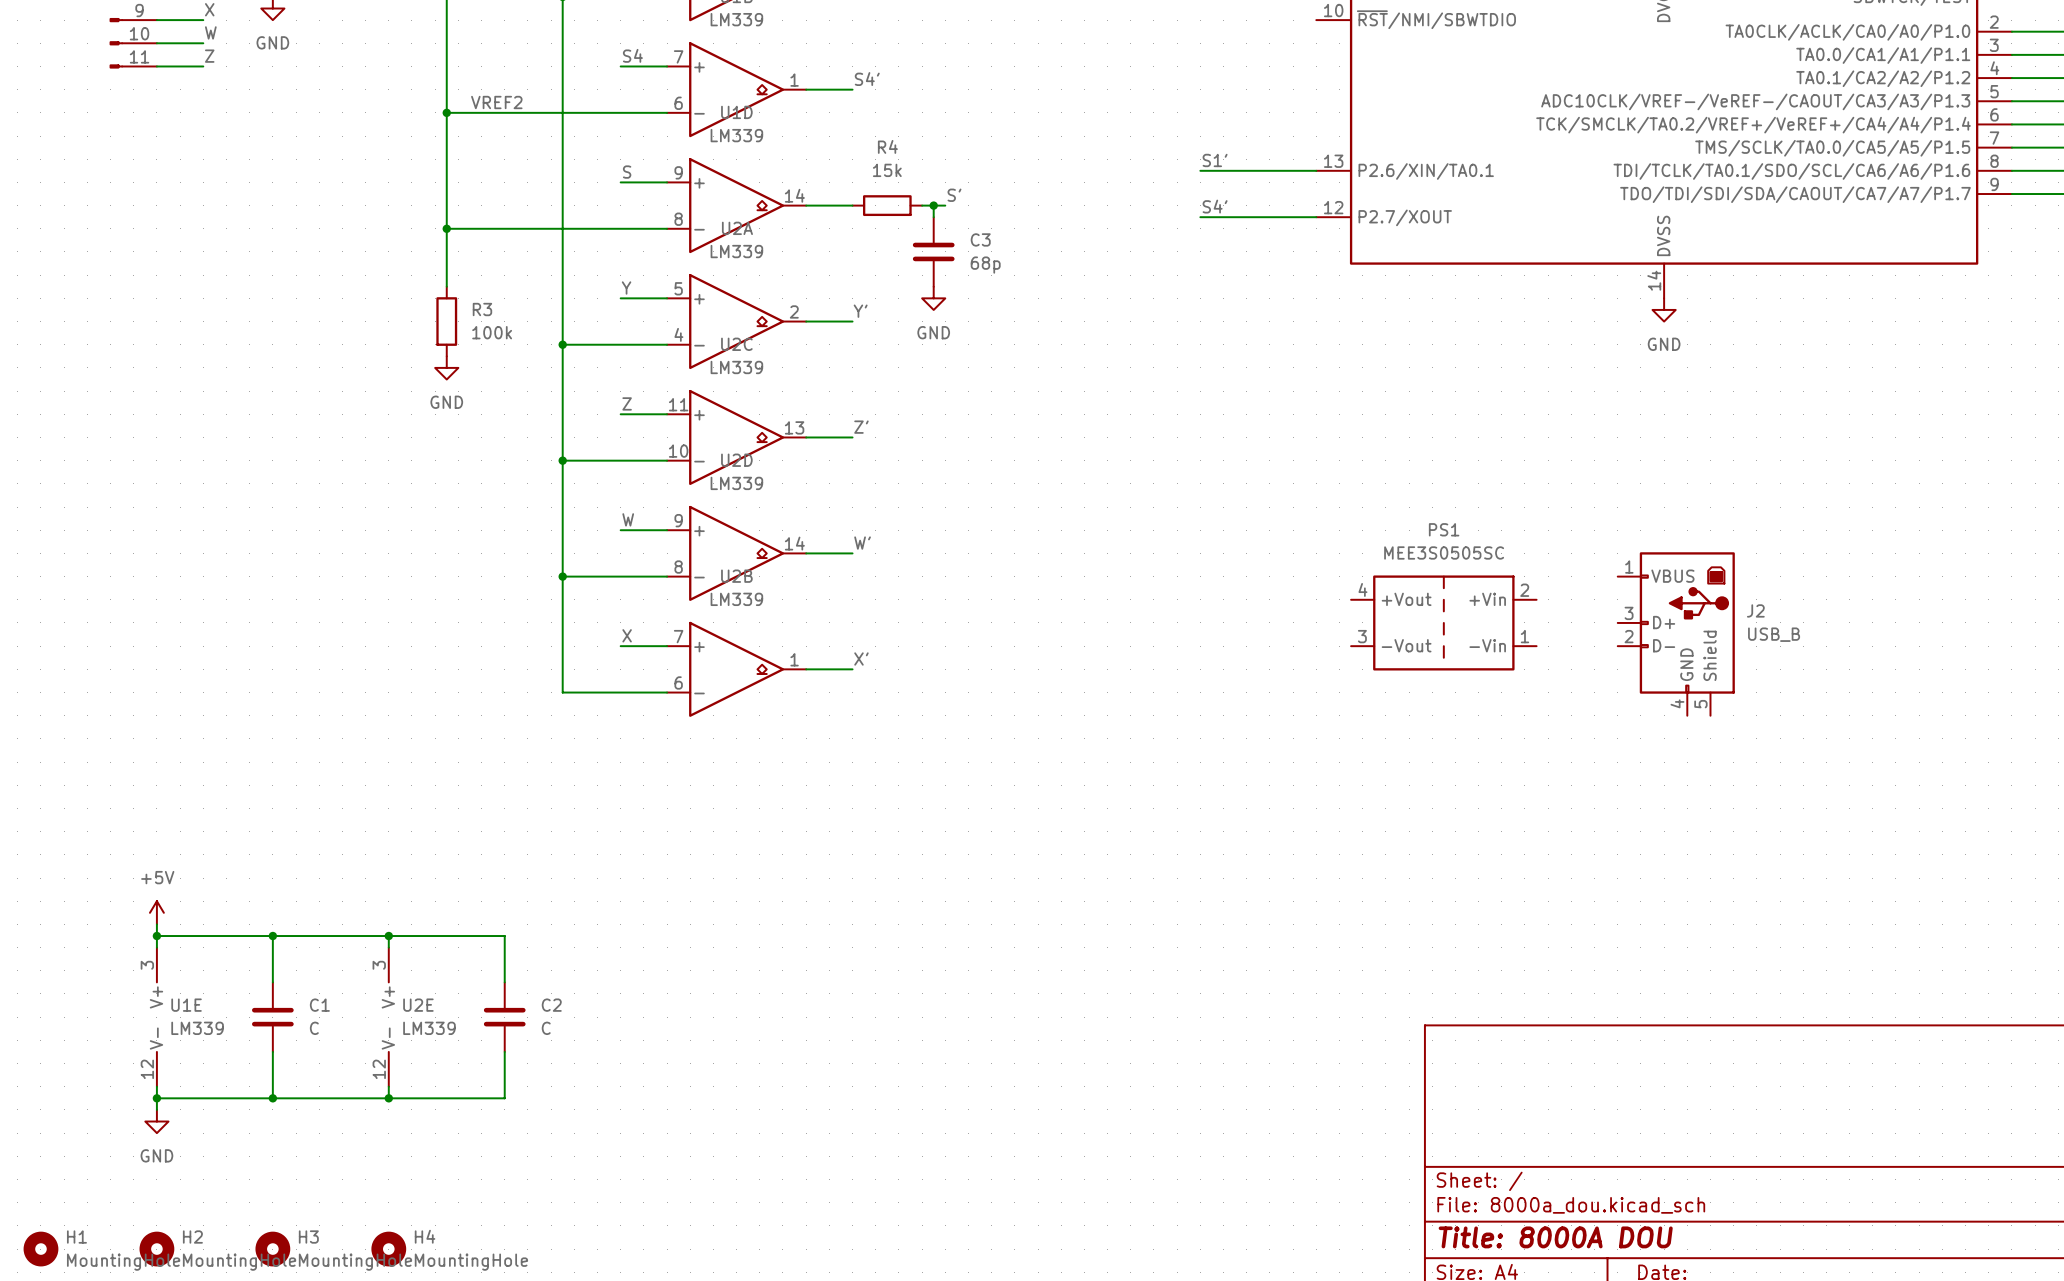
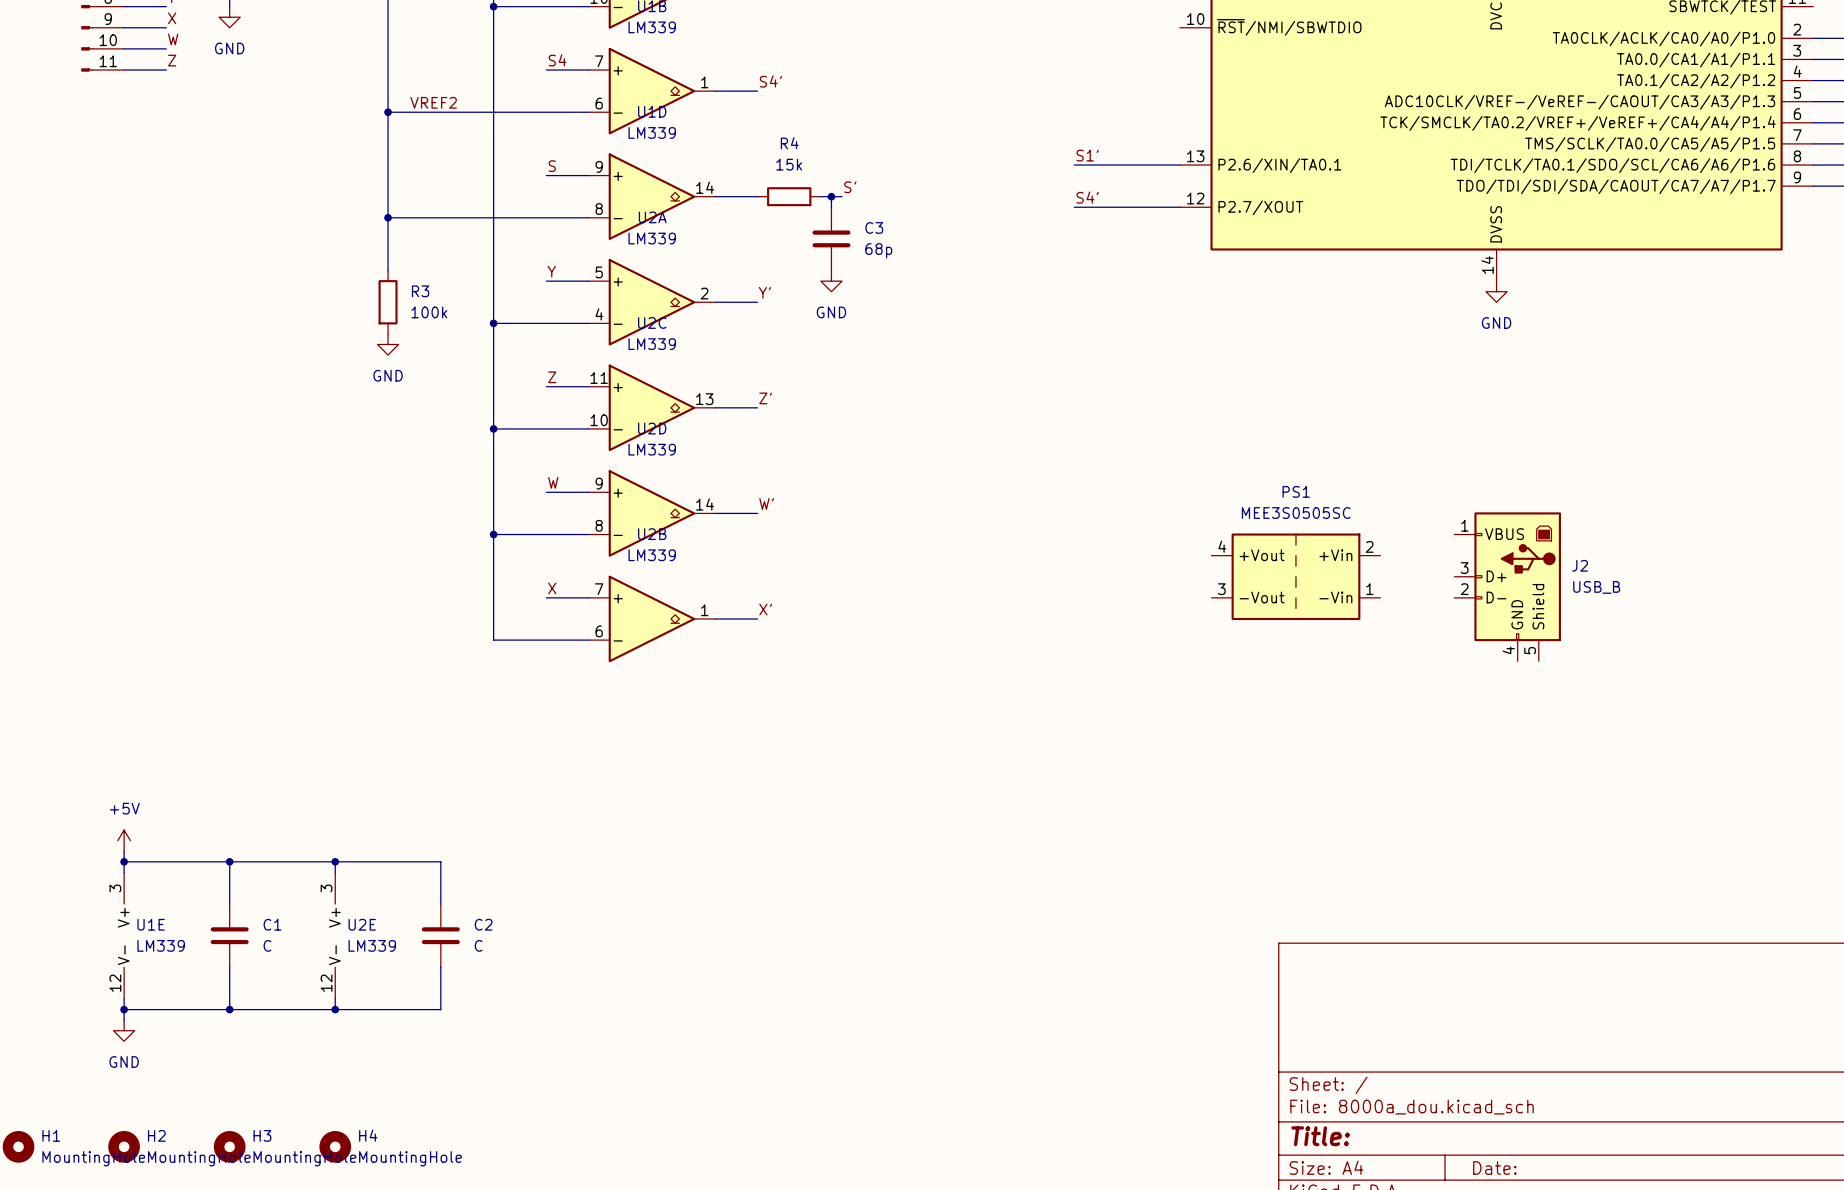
title block: Title: 8000A DOU (1555, 1237) -> Title: (1320, 1136)

